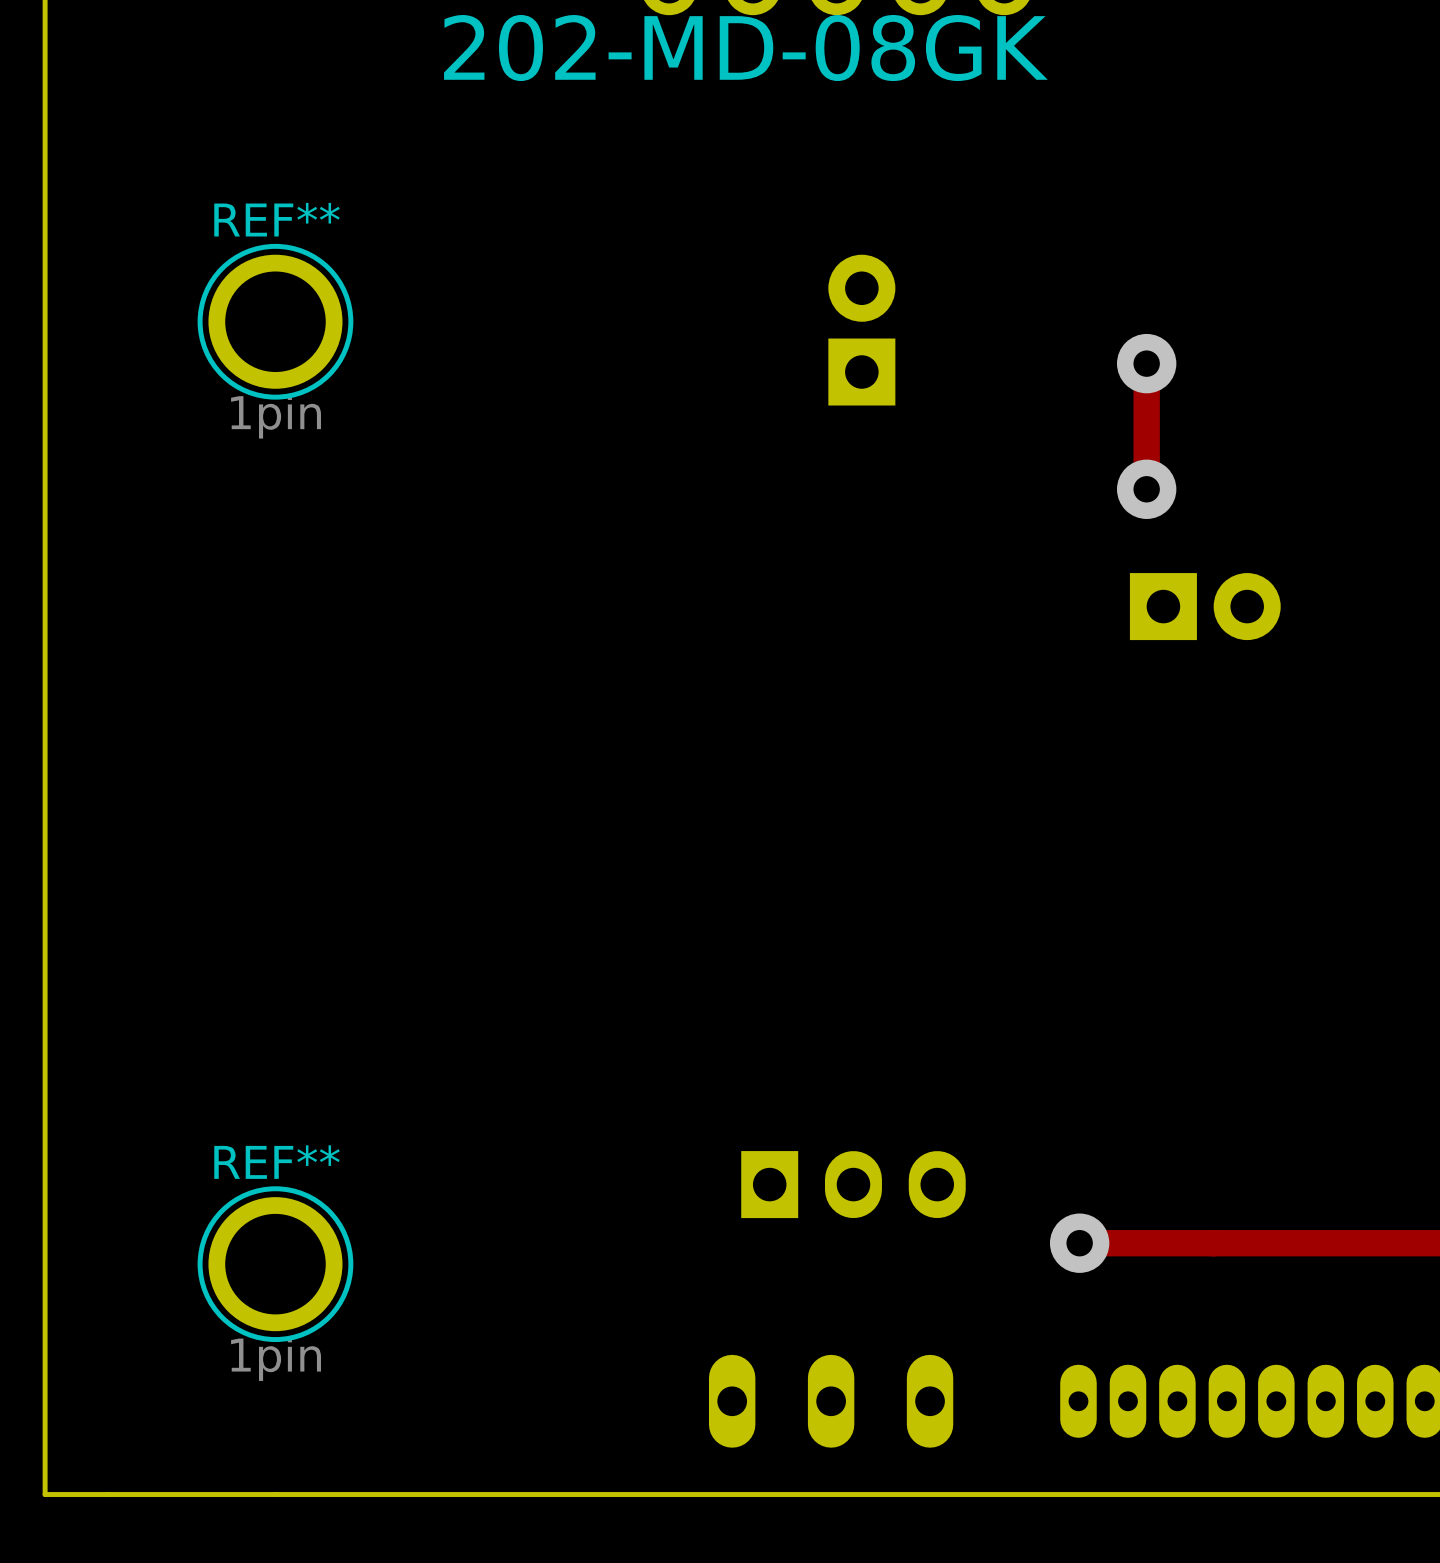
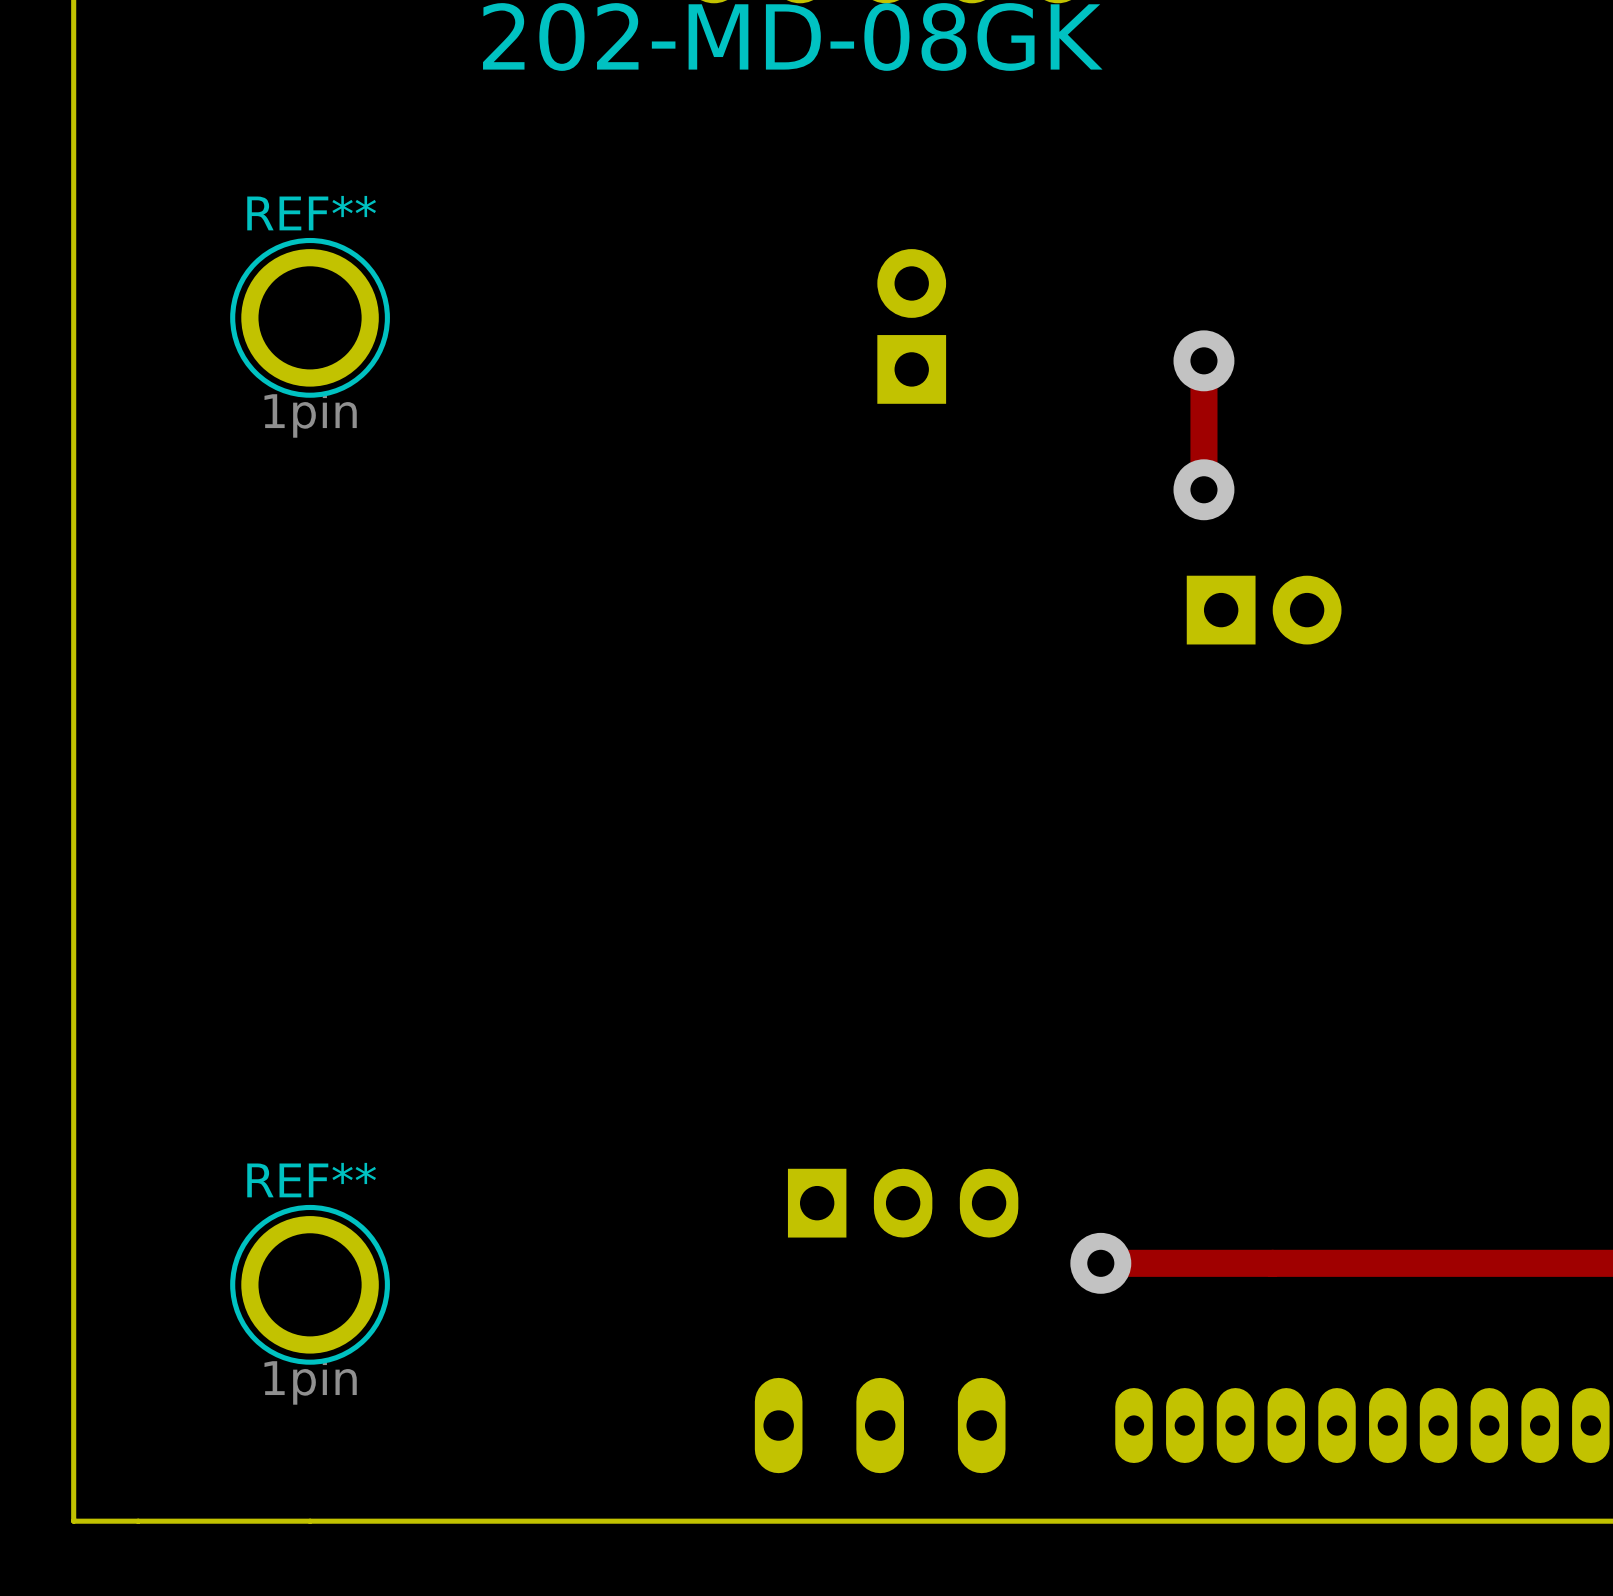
via position: (1079, 1243) -> (1100, 1263)

